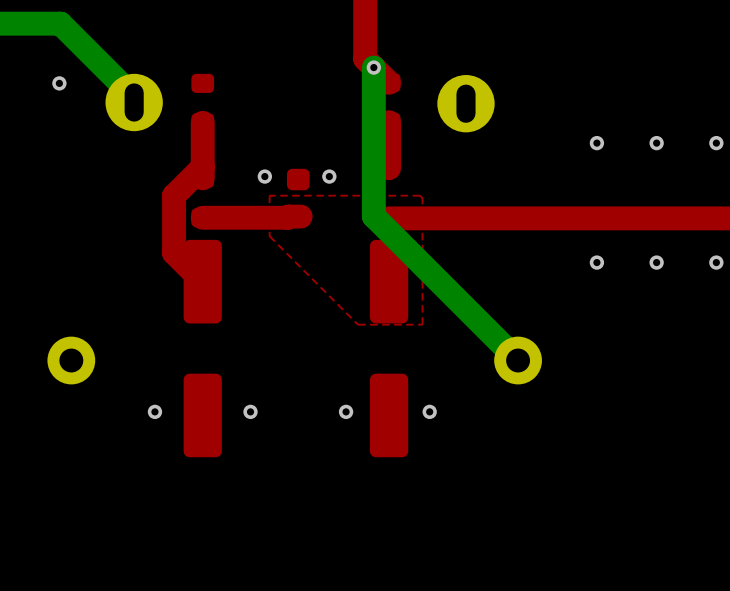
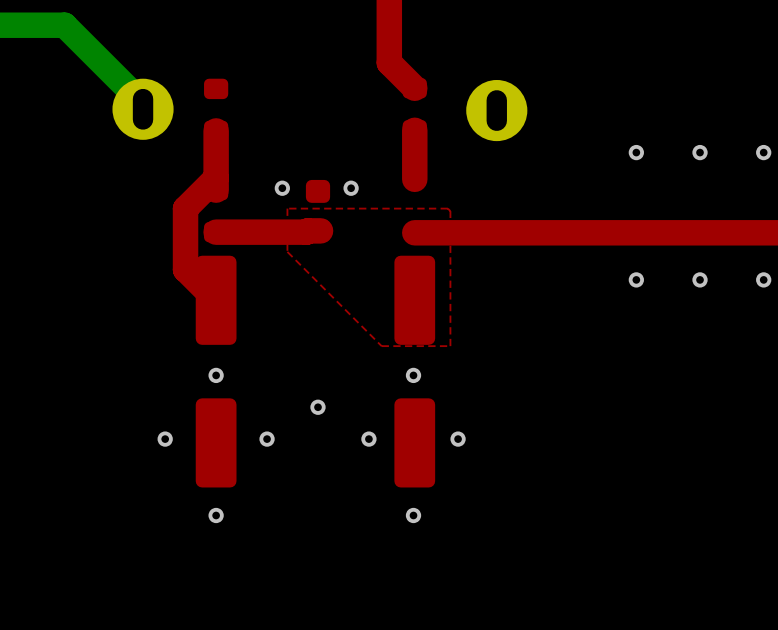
bottom track: (373, 67) (373, 216) (518, 360) -> none
via: (373, 67) -> none
via: (59, 83) -> none
via: none -> (216, 375)
via: none -> (413, 375)
part: (71, 360) -> none
part: (518, 360) -> none
via: none -> (317, 407)
via: none -> (216, 515)
via: none -> (413, 515)

